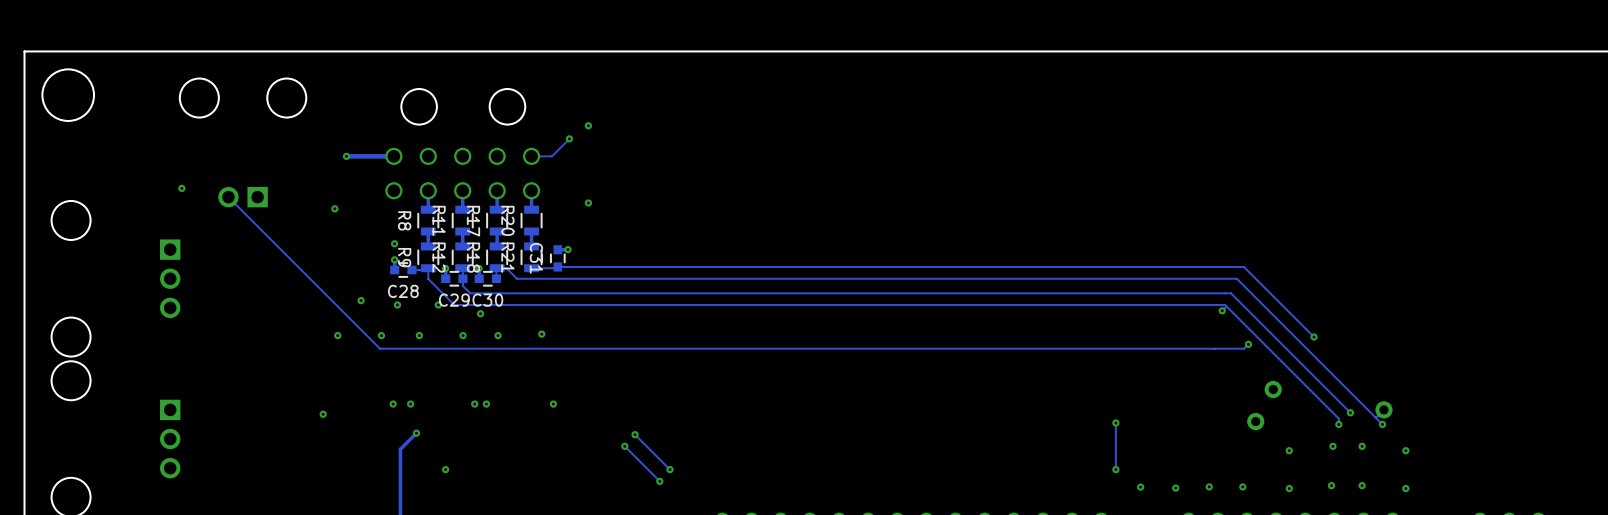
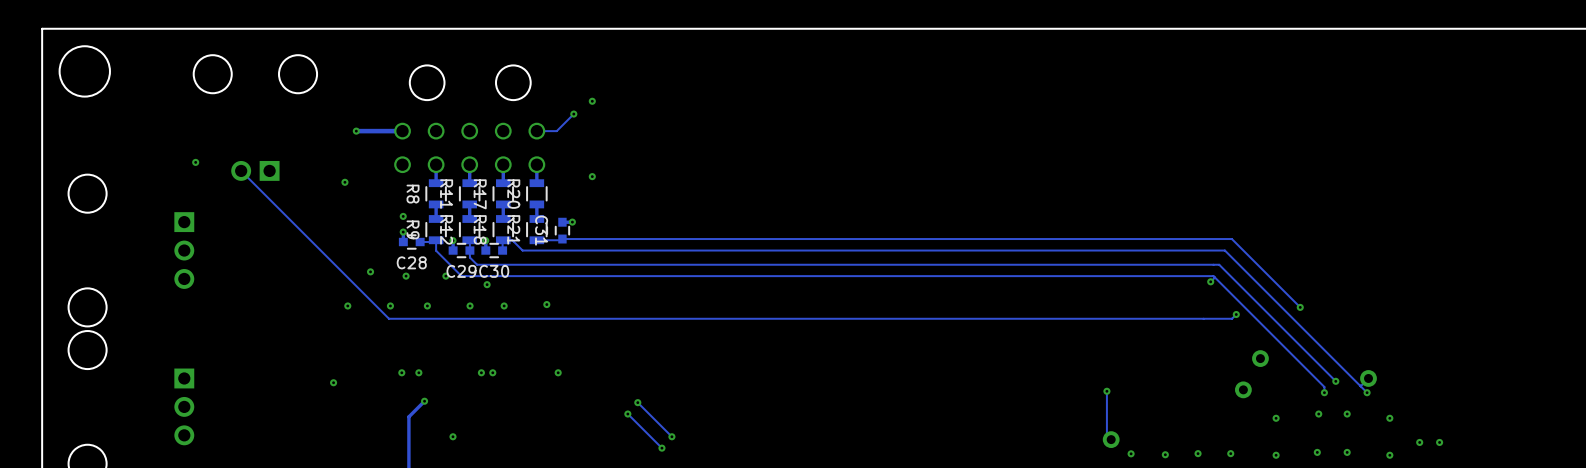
via: (1115, 469) -> none
part: none -> (1111, 439)
via: none -> (1419, 442)
via: none -> (1439, 442)

